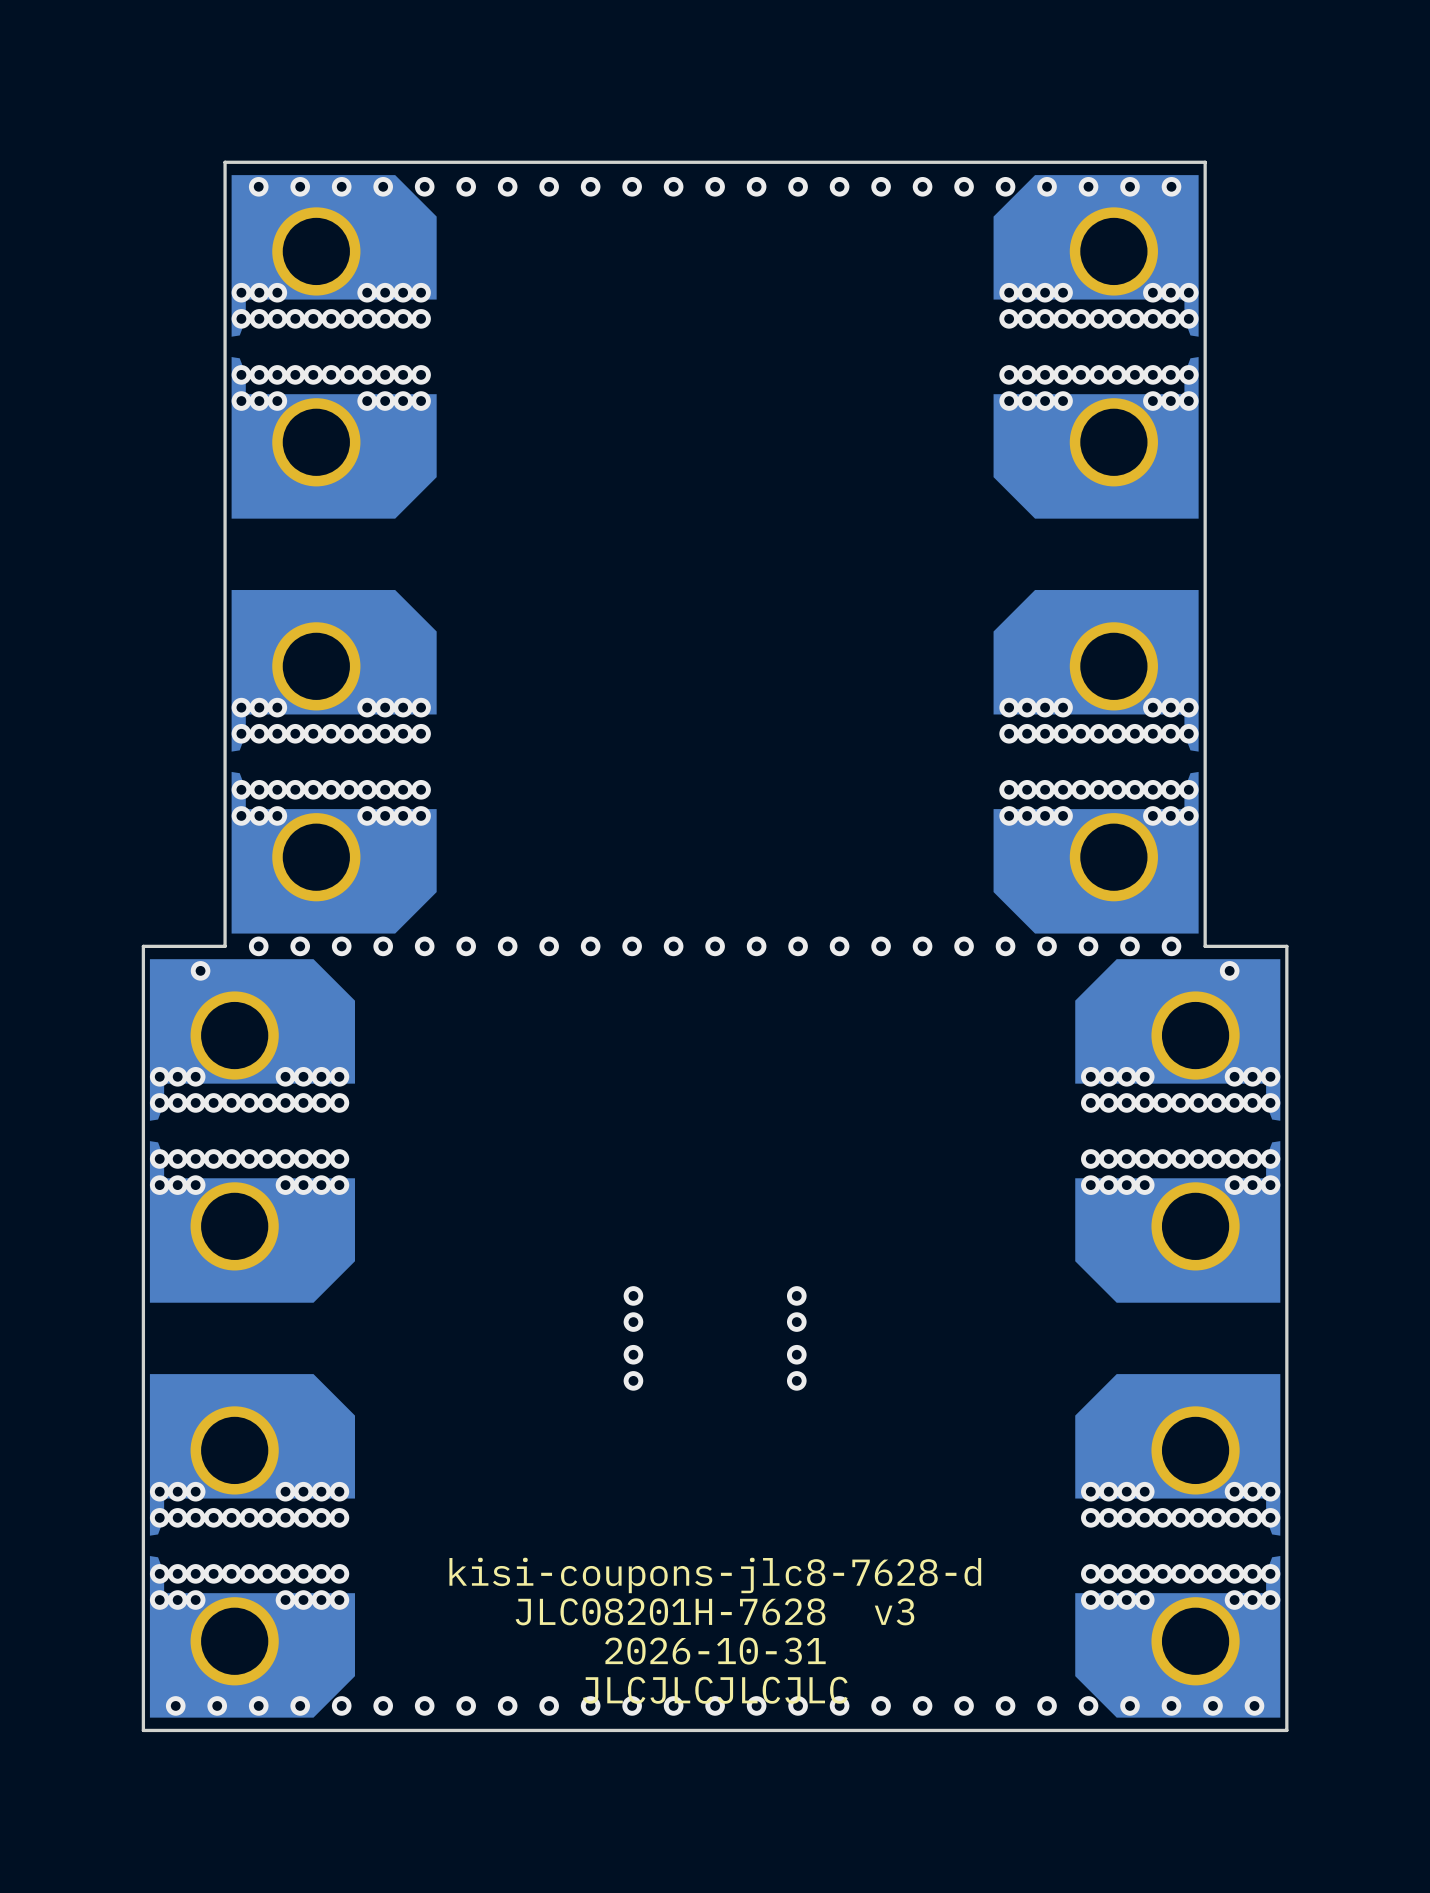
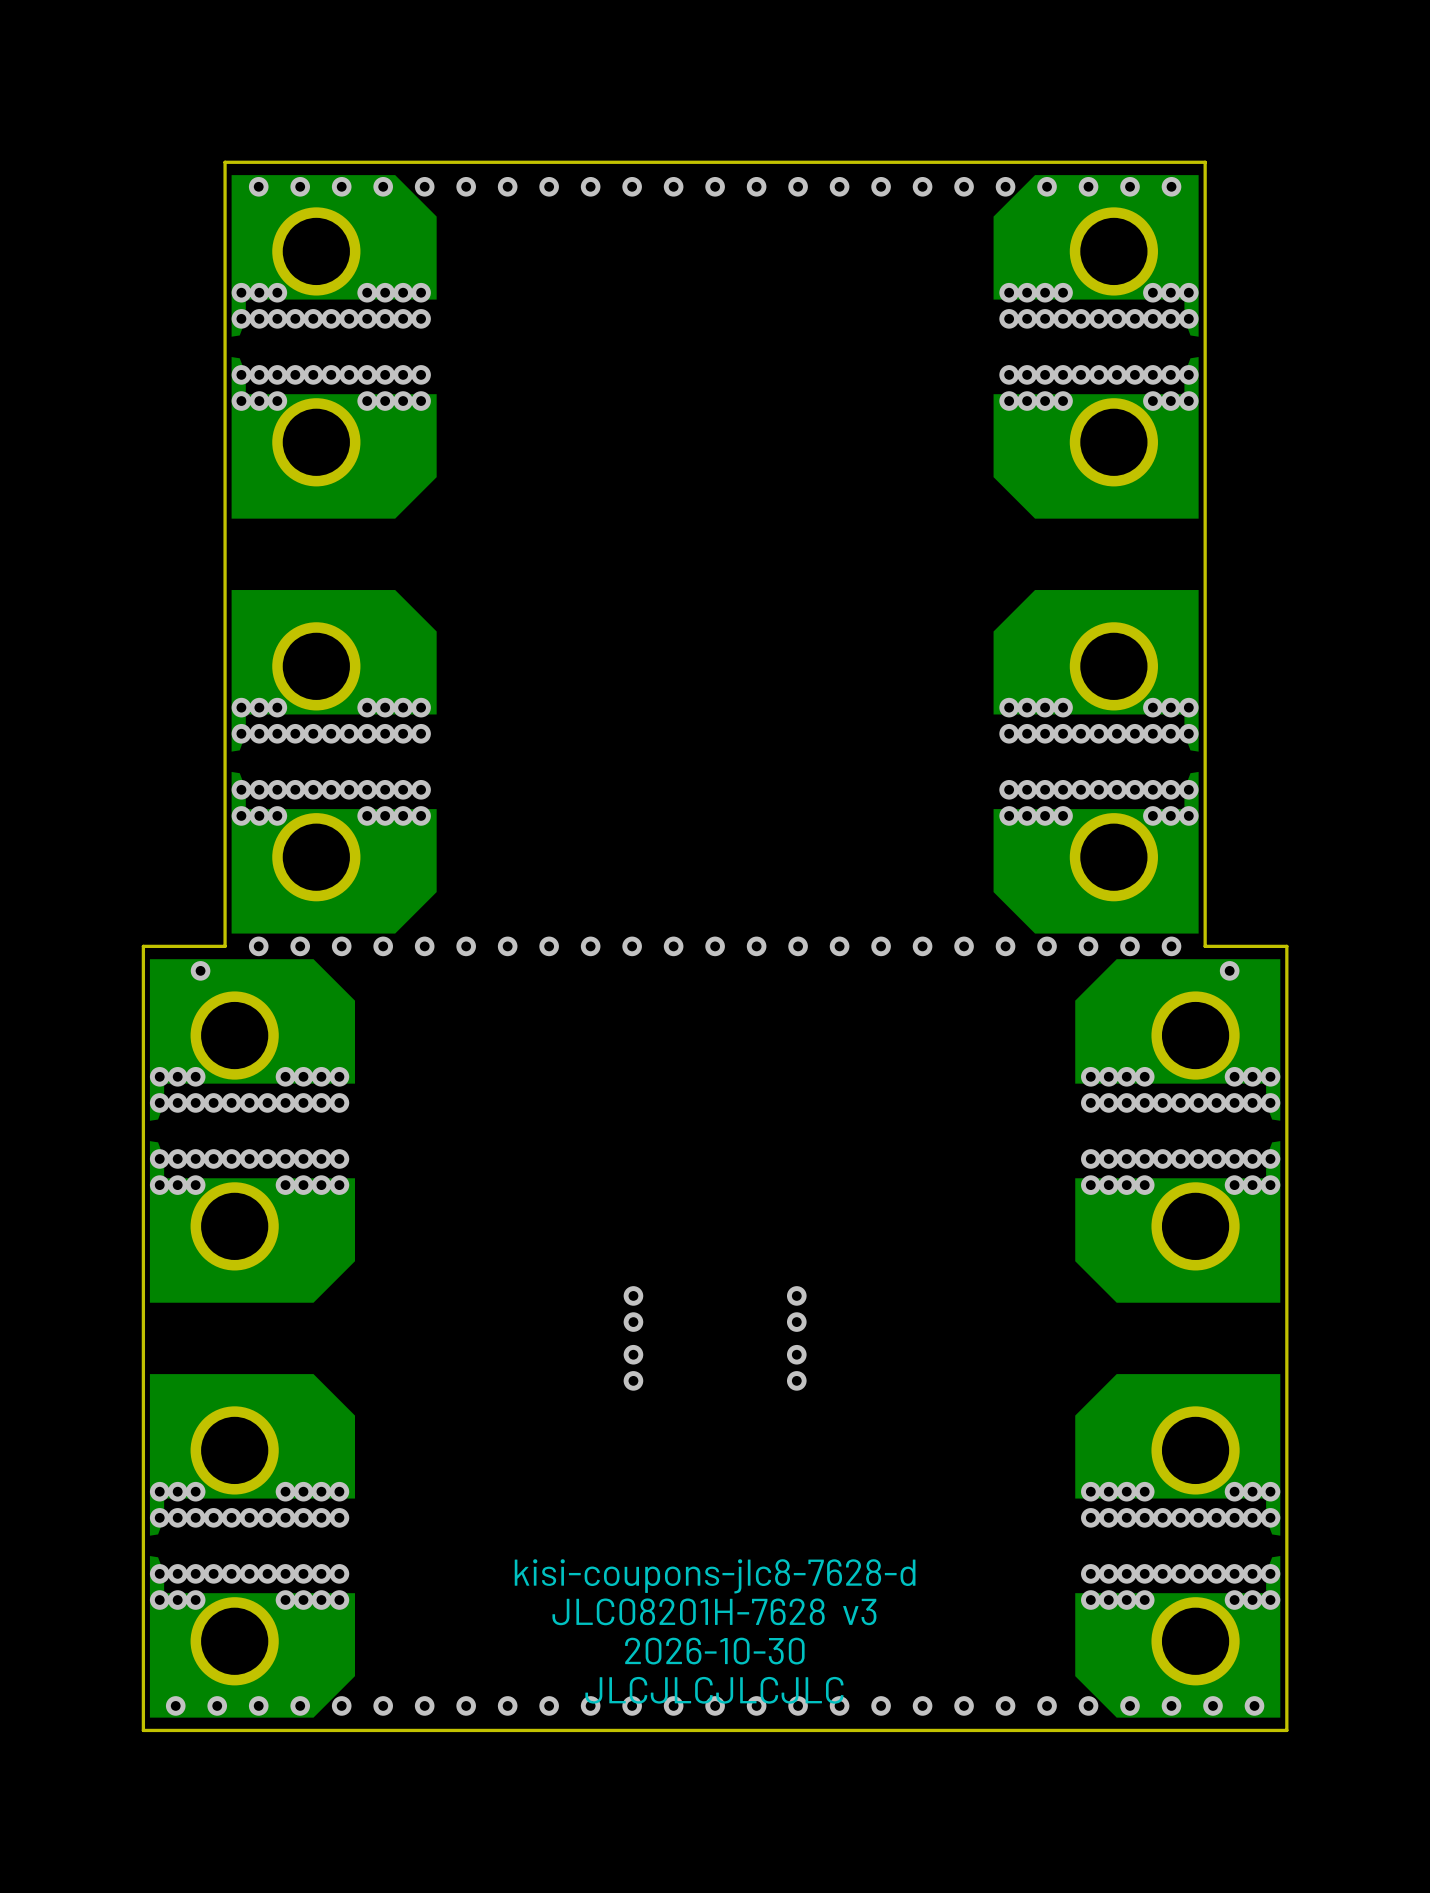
text: 2026-10-31 (715, 1651) -> 2026-10-30 (714, 1651)

